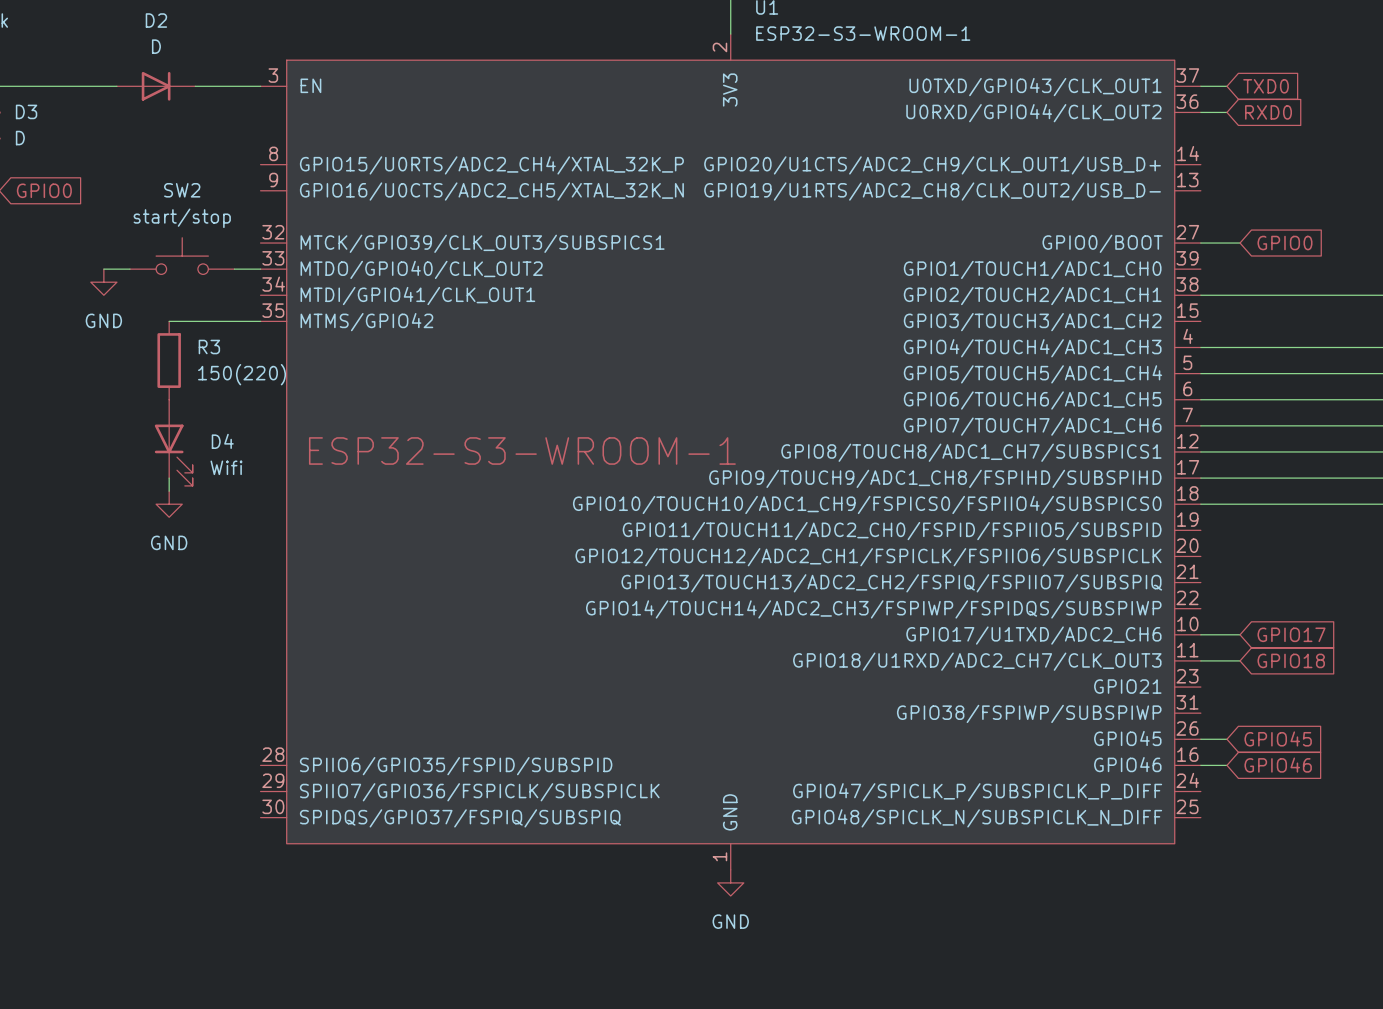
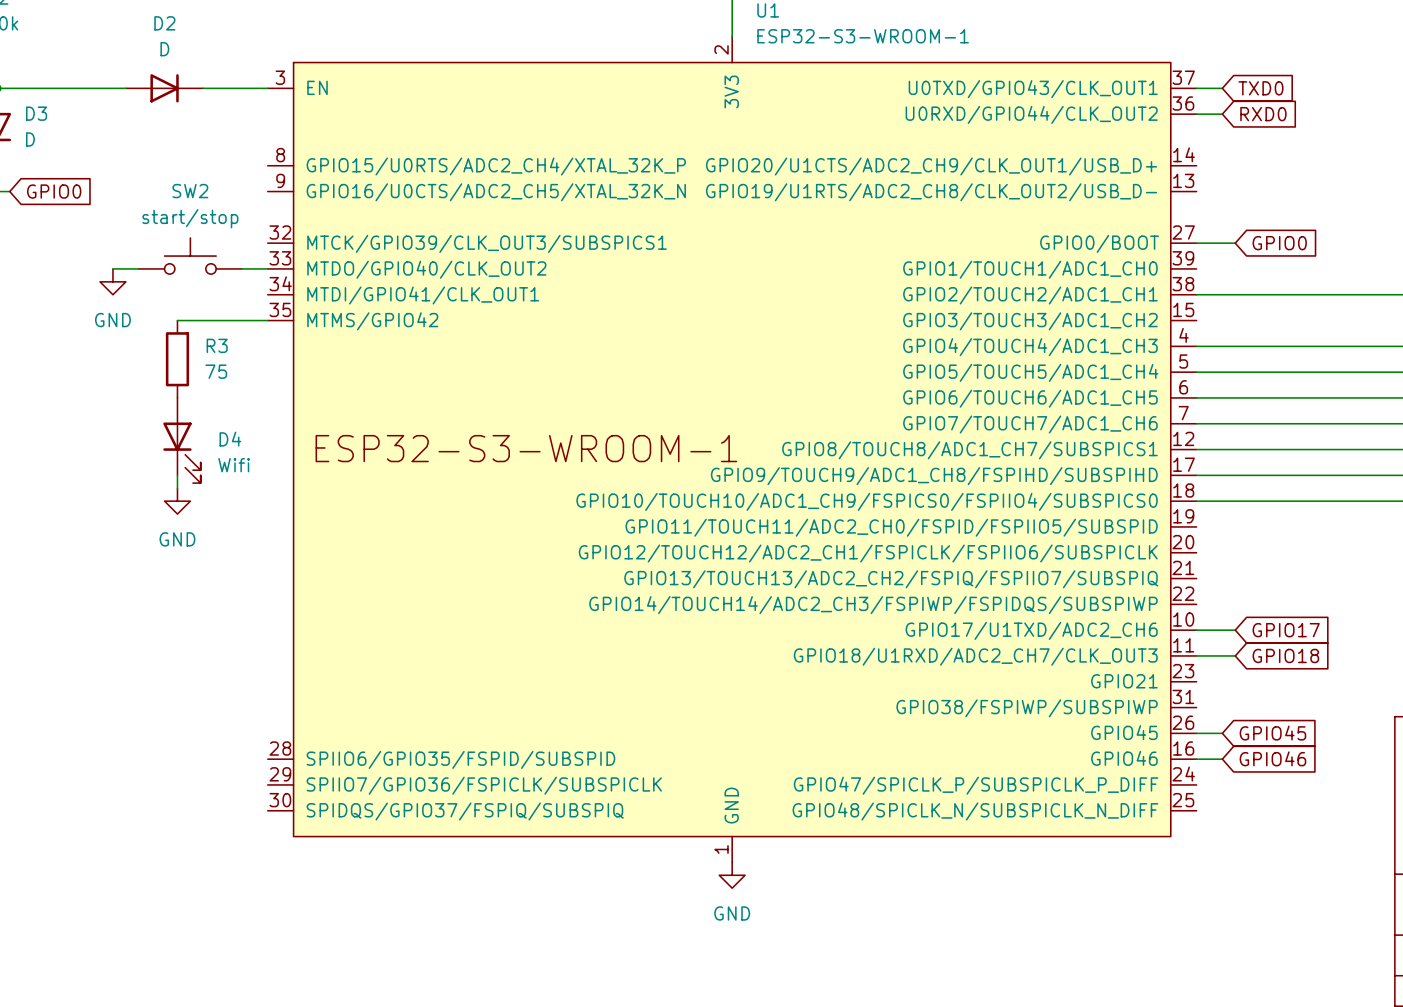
R3 value: 150(220) (242, 374) -> 75 (216, 371)

